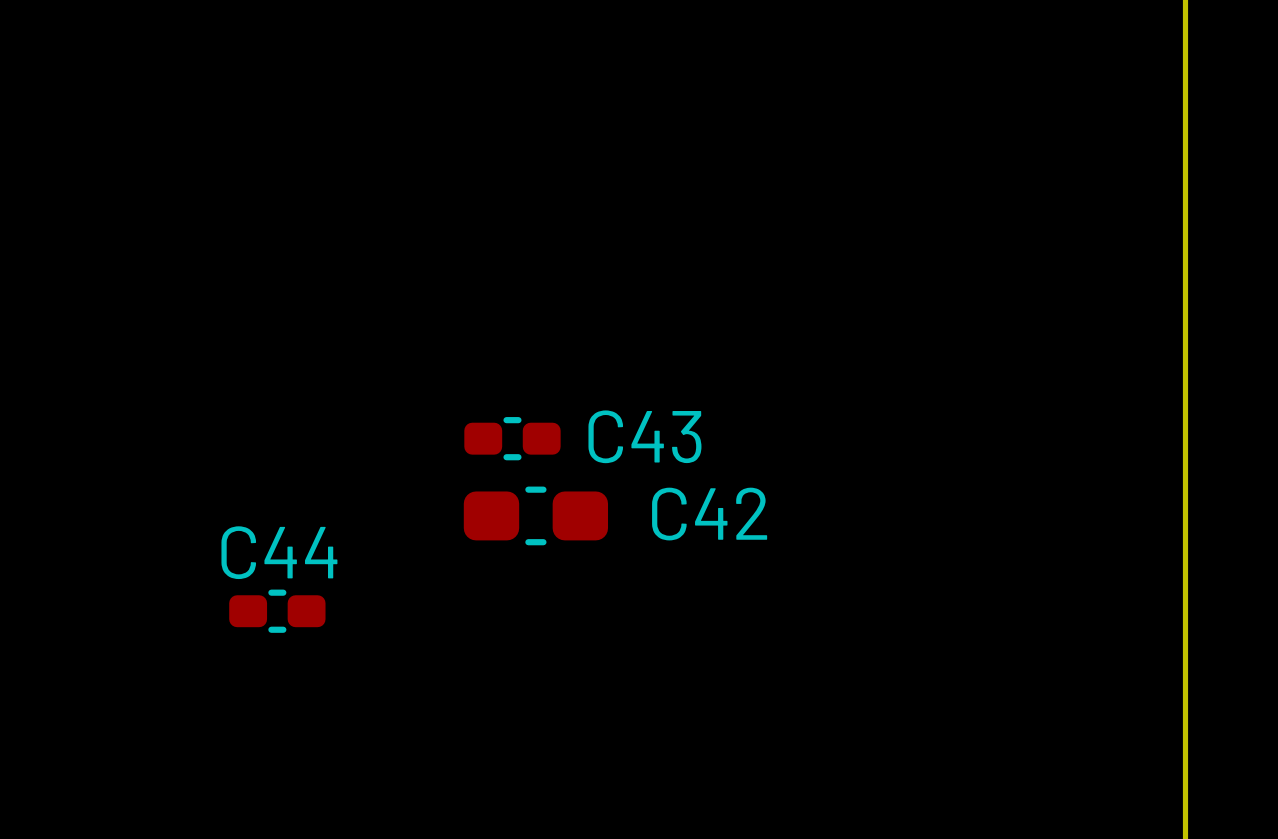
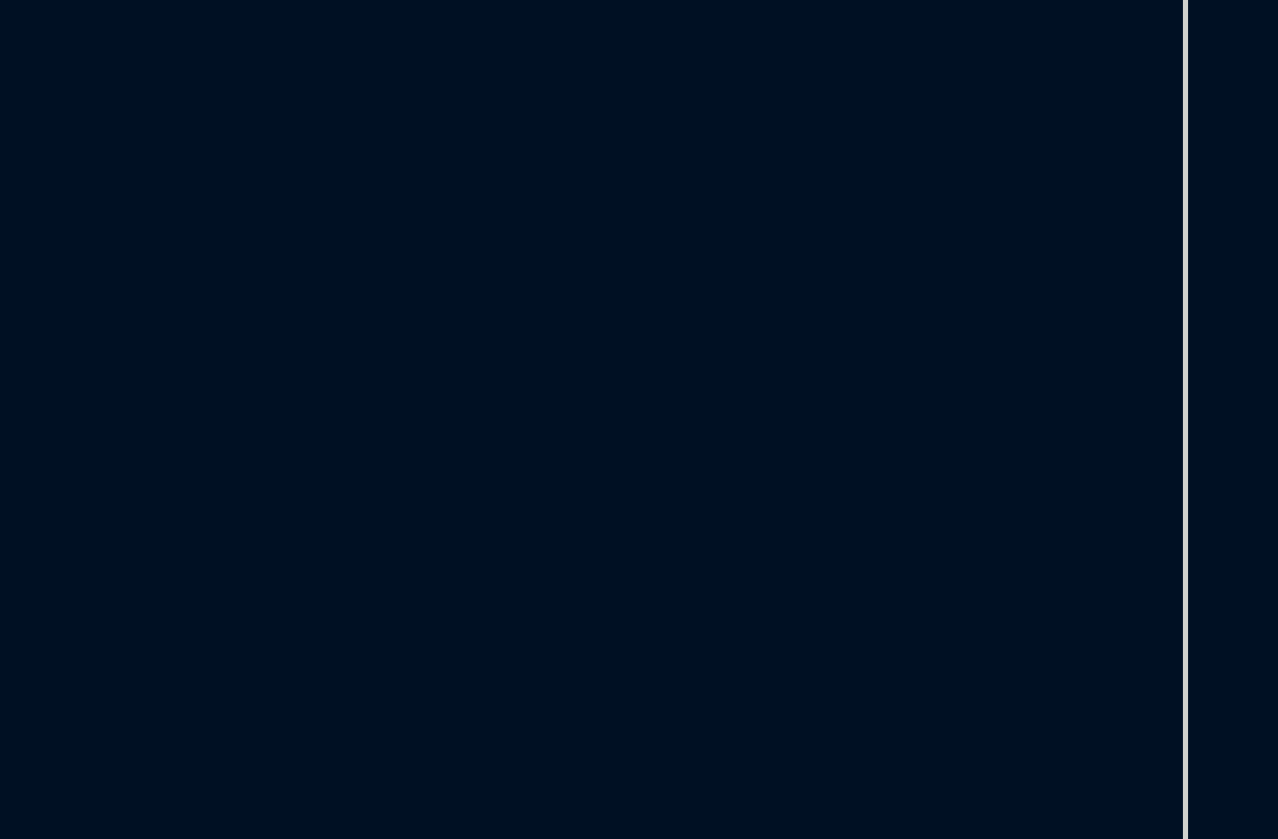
C43: (512, 438) -> none
C42: (535, 515) -> none
C44: (277, 611) -> none

